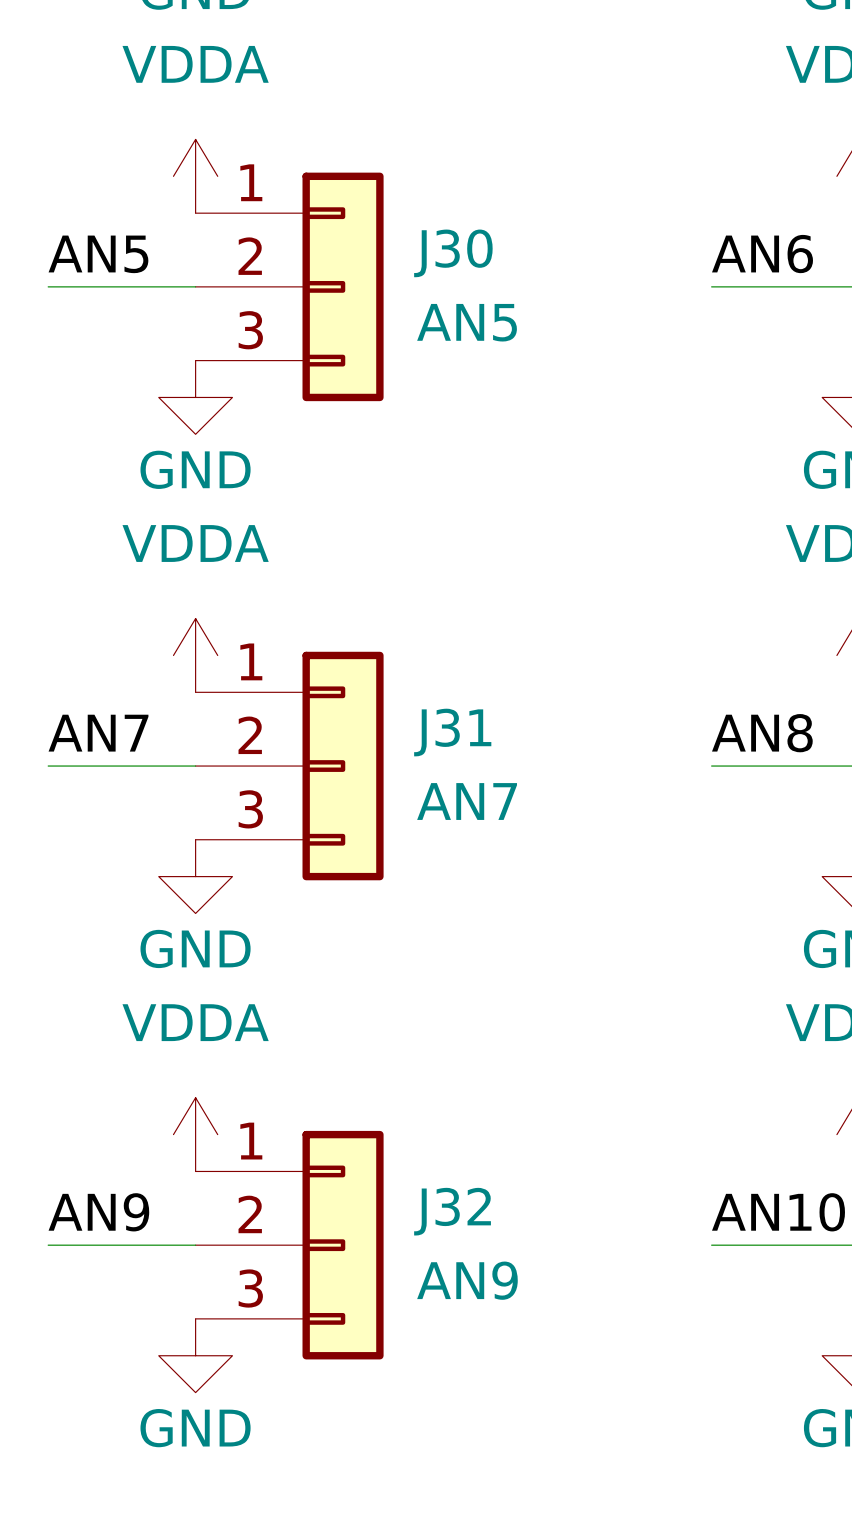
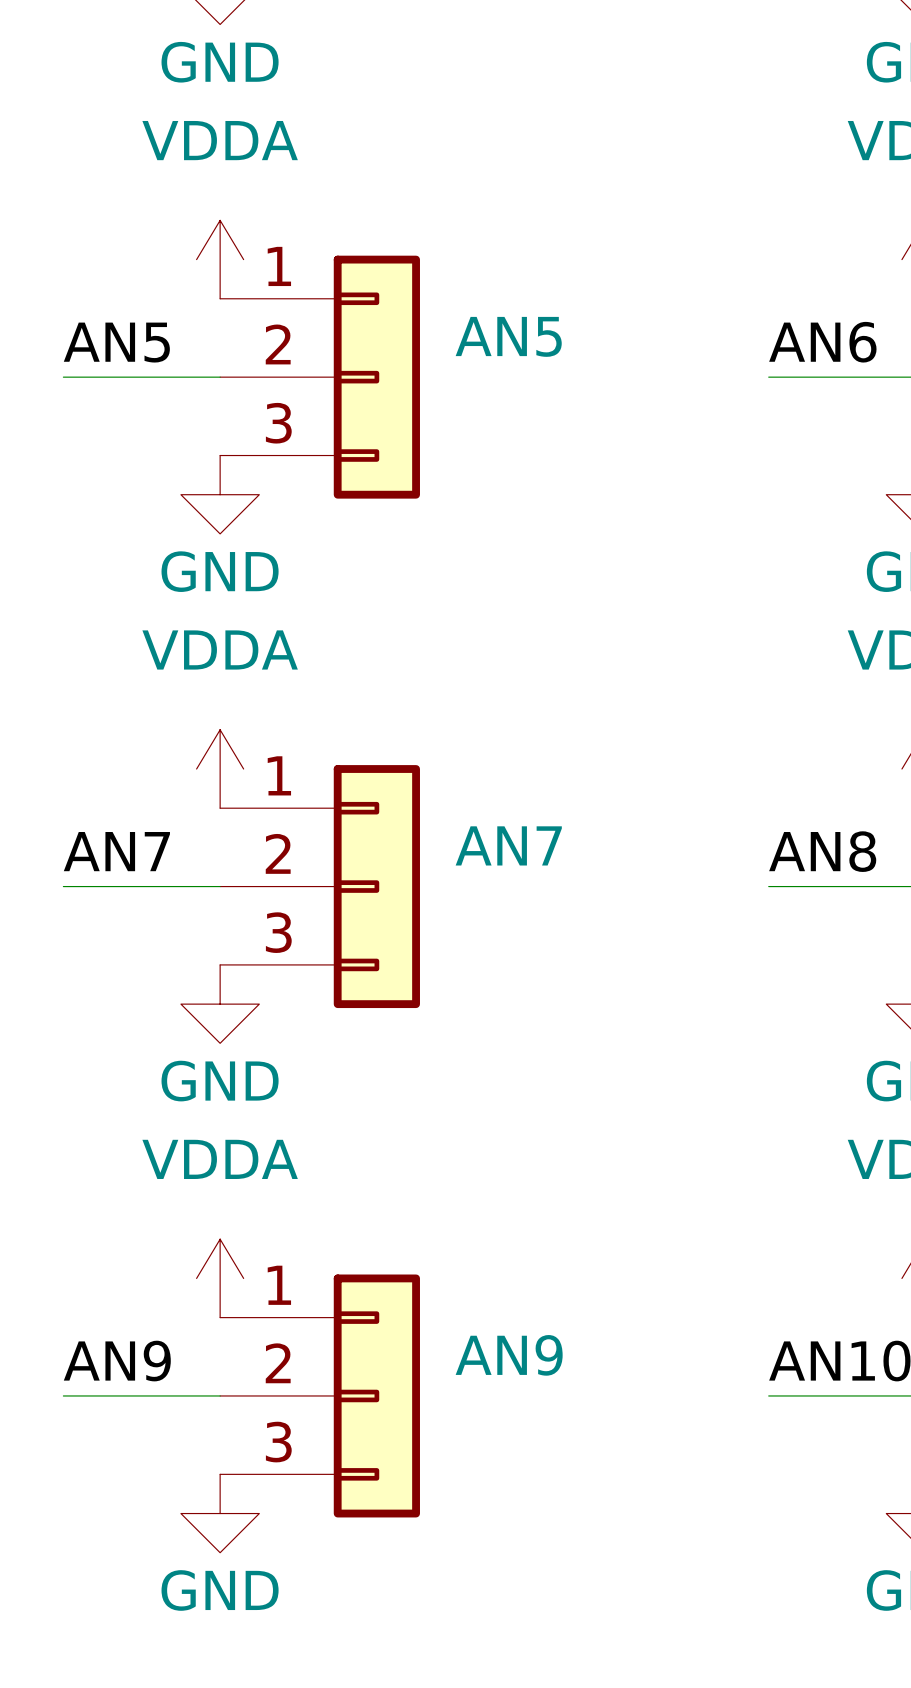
J30 name: J30 (453, 253) -> AN5 (508, 336)
J30 value: AN5 (467, 322) -> none
J31 name: J31 (452, 732) -> AN7 (508, 845)
J31 value: AN7 (467, 801) -> none
J32 name: J32 (452, 1211) -> AN9 (509, 1355)
J32 value: AN9 (467, 1280) -> none

